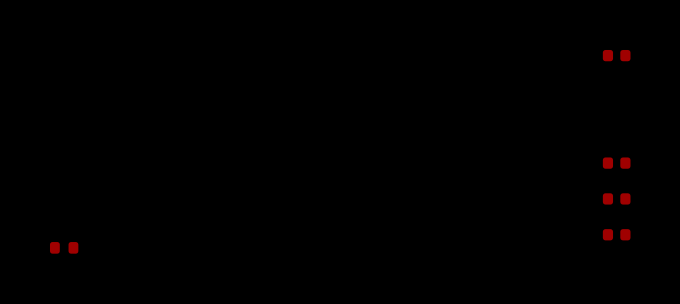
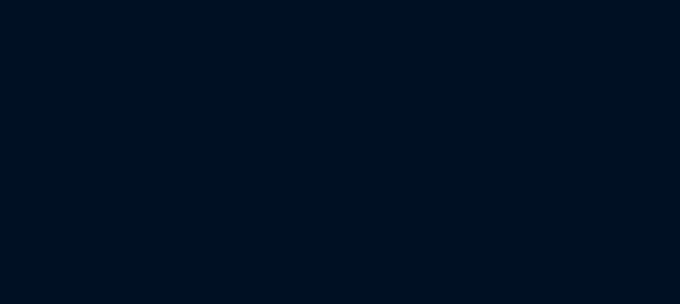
part: (616, 55) -> none
part: (616, 163) -> none
part: (616, 198) -> none
part: (616, 234) -> none
part: (64, 247) -> none

